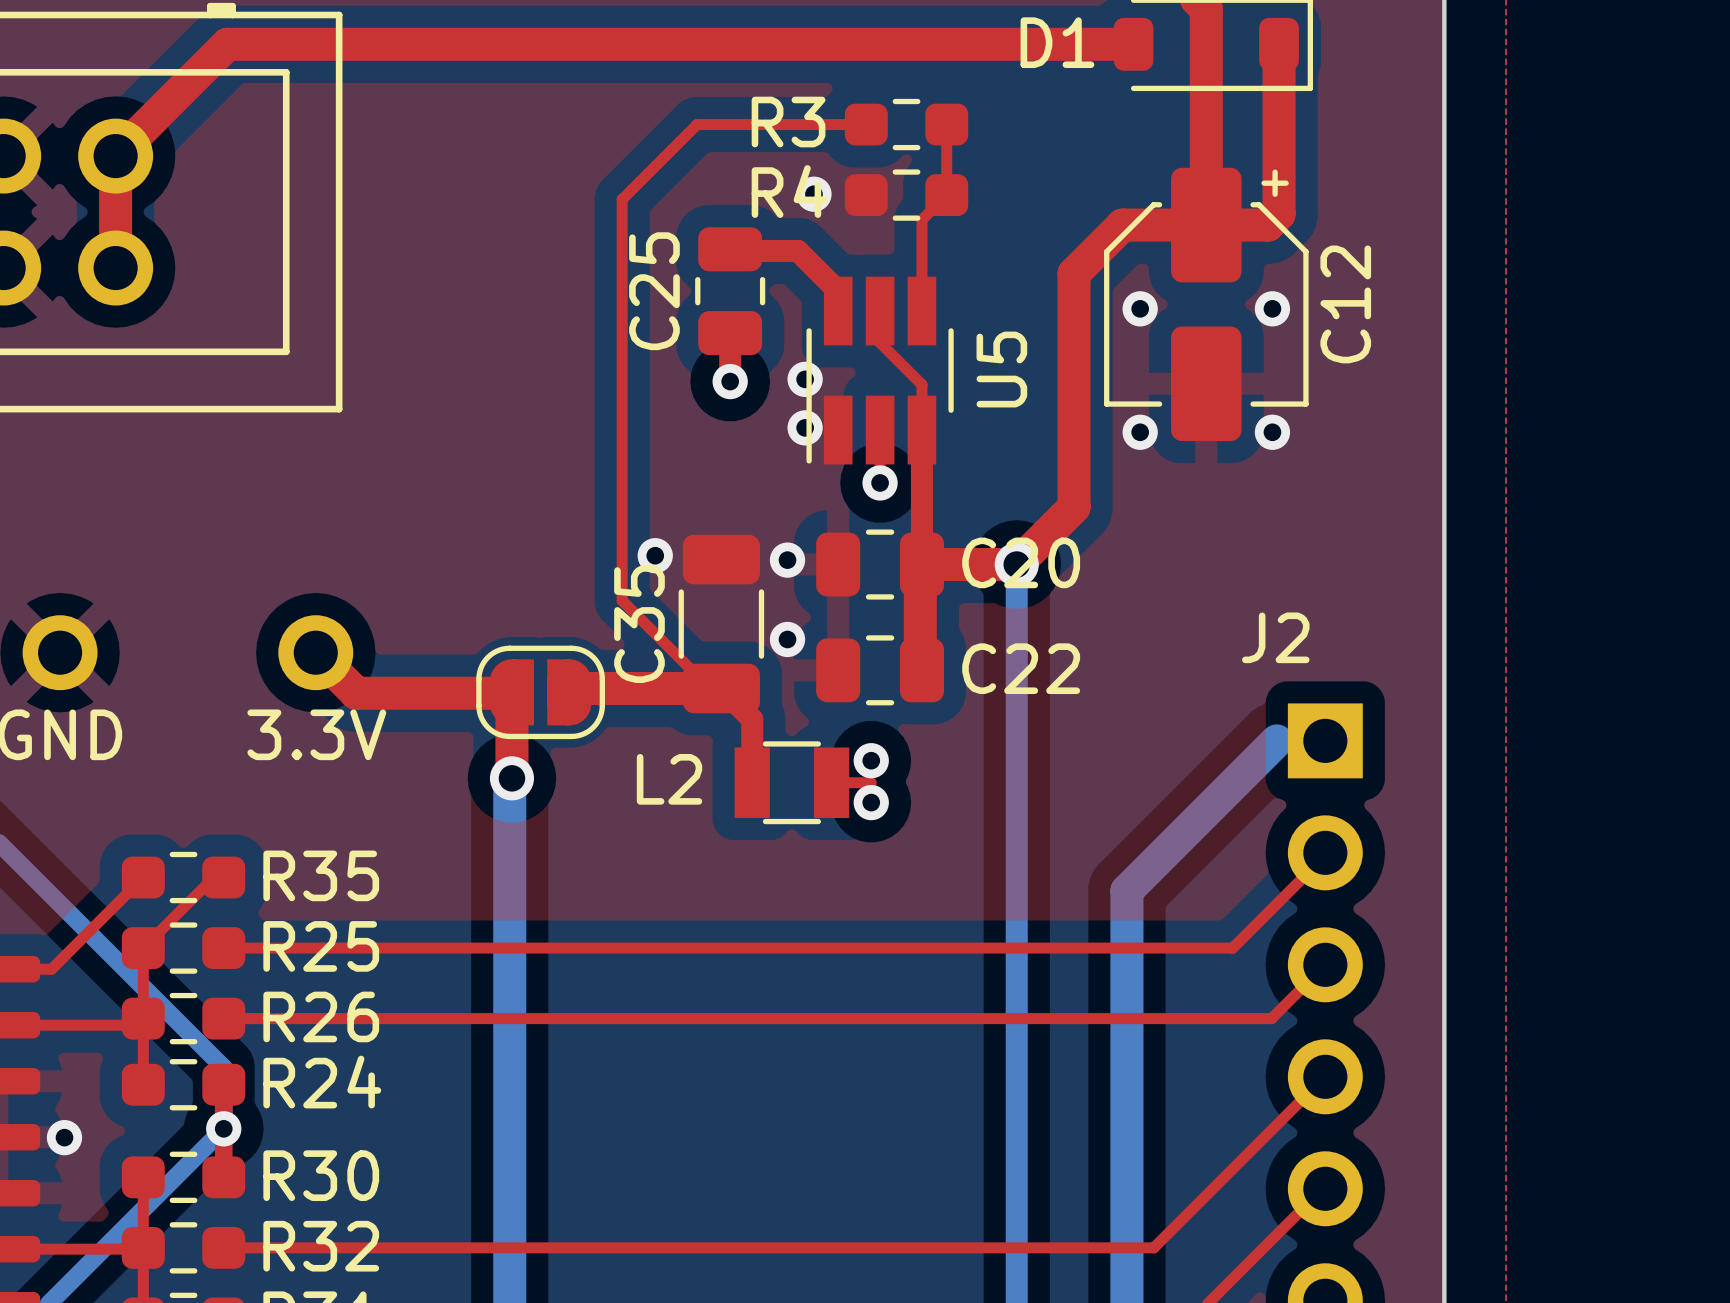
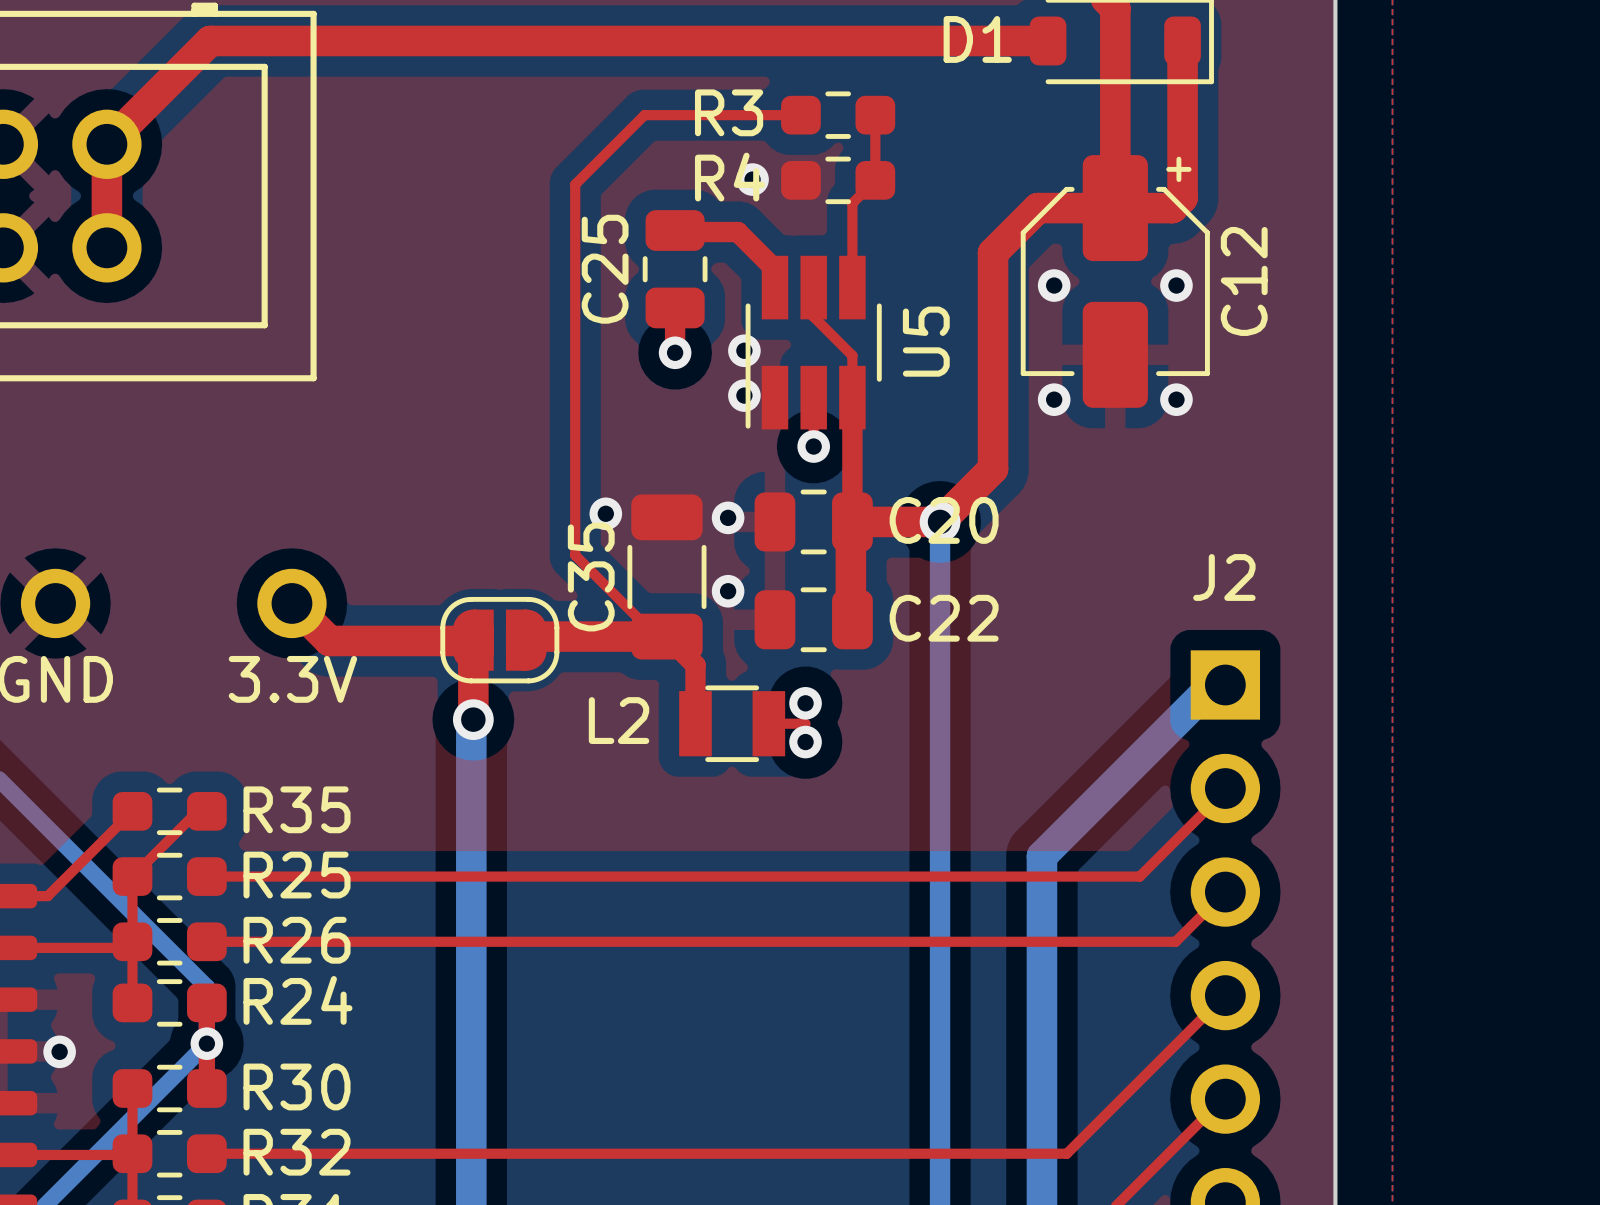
text position: J2 (1275, 637) -> J2 (1224, 577)
bottom track: (1276, 740) (1126, 890) (1126, 926) -> (1225, 684) (1213, 684) (1041, 856)

